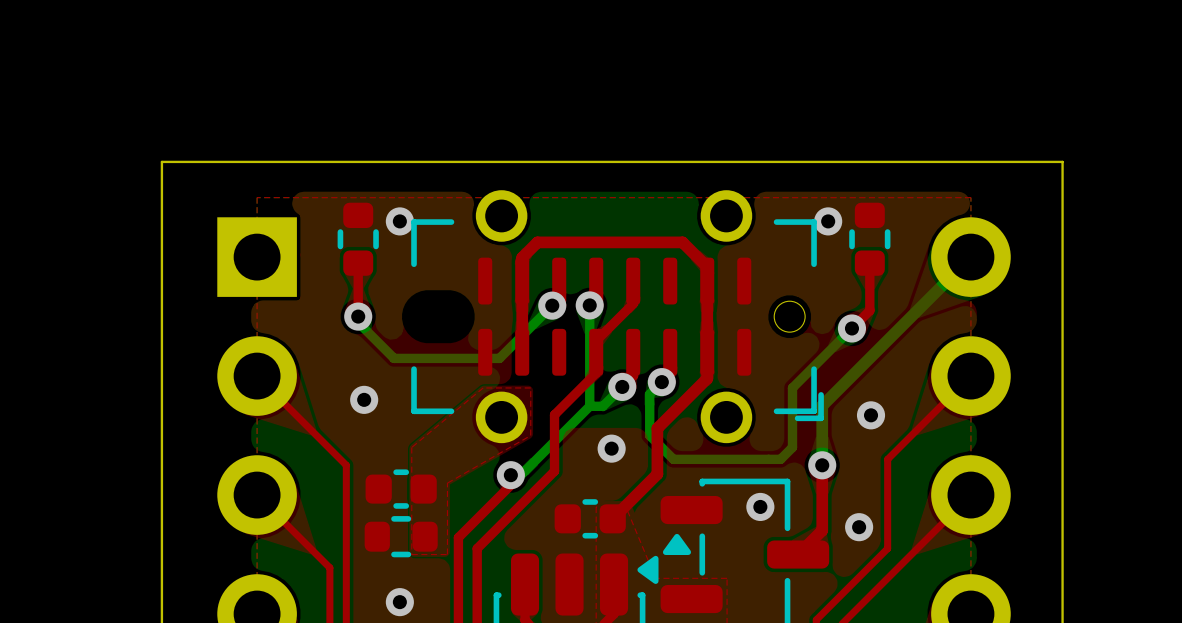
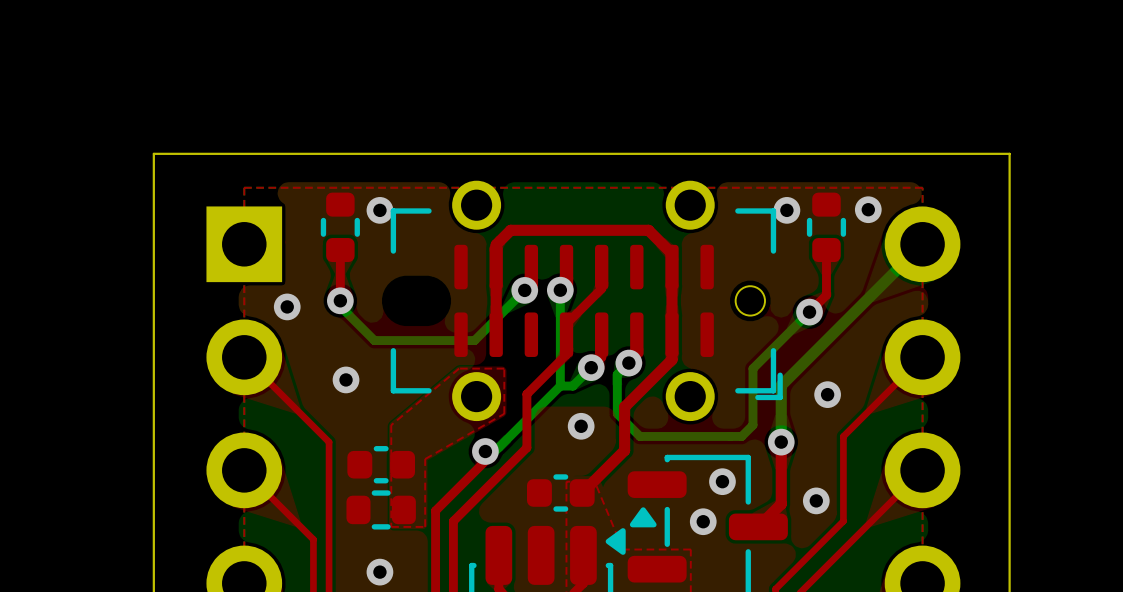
via: none -> (868, 209)
via: none -> (287, 306)
via: none -> (703, 521)

